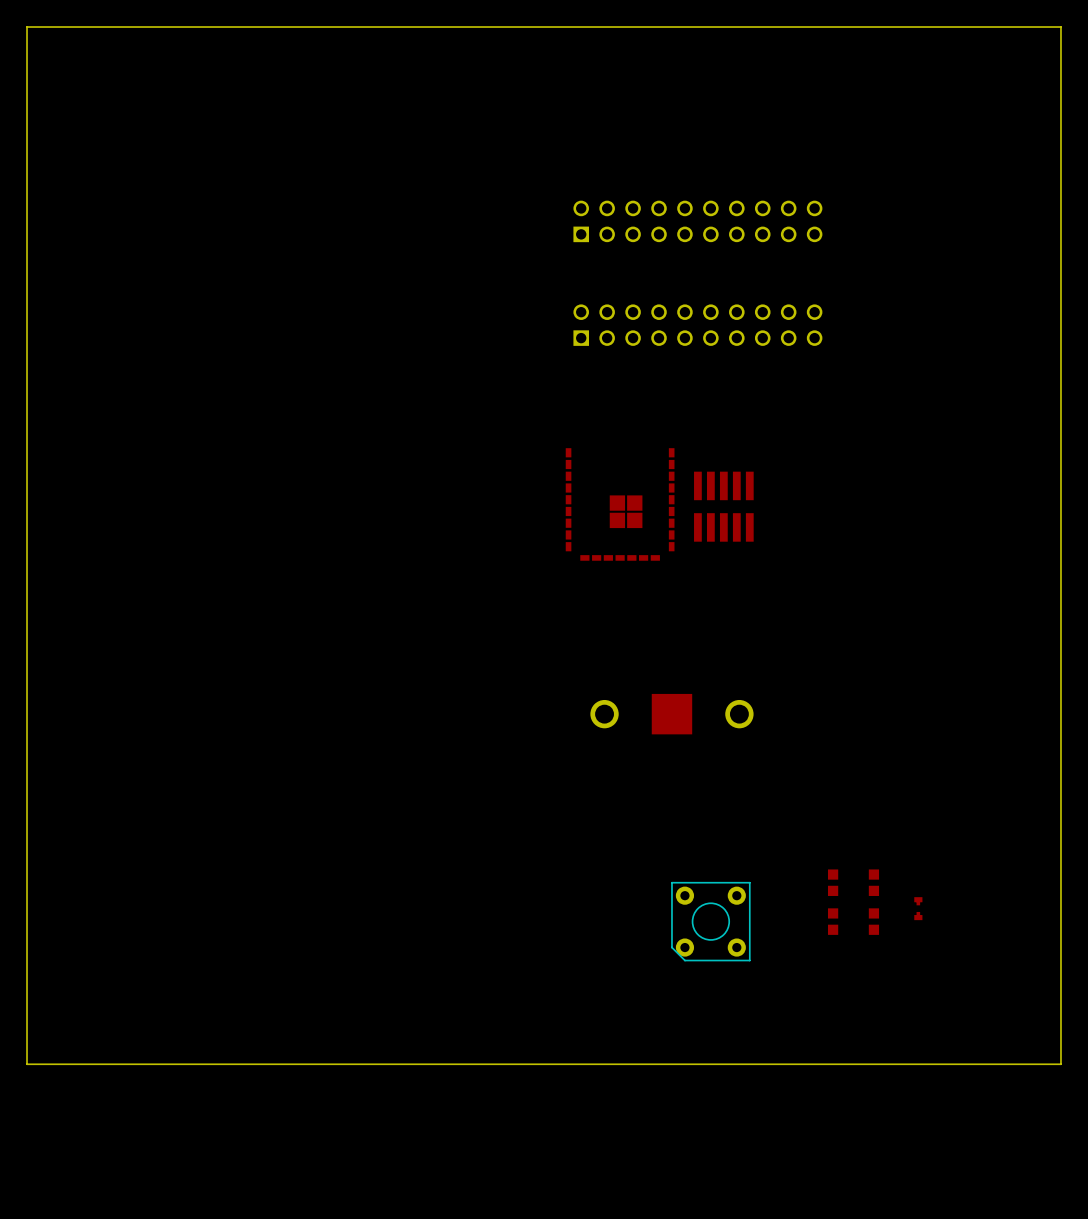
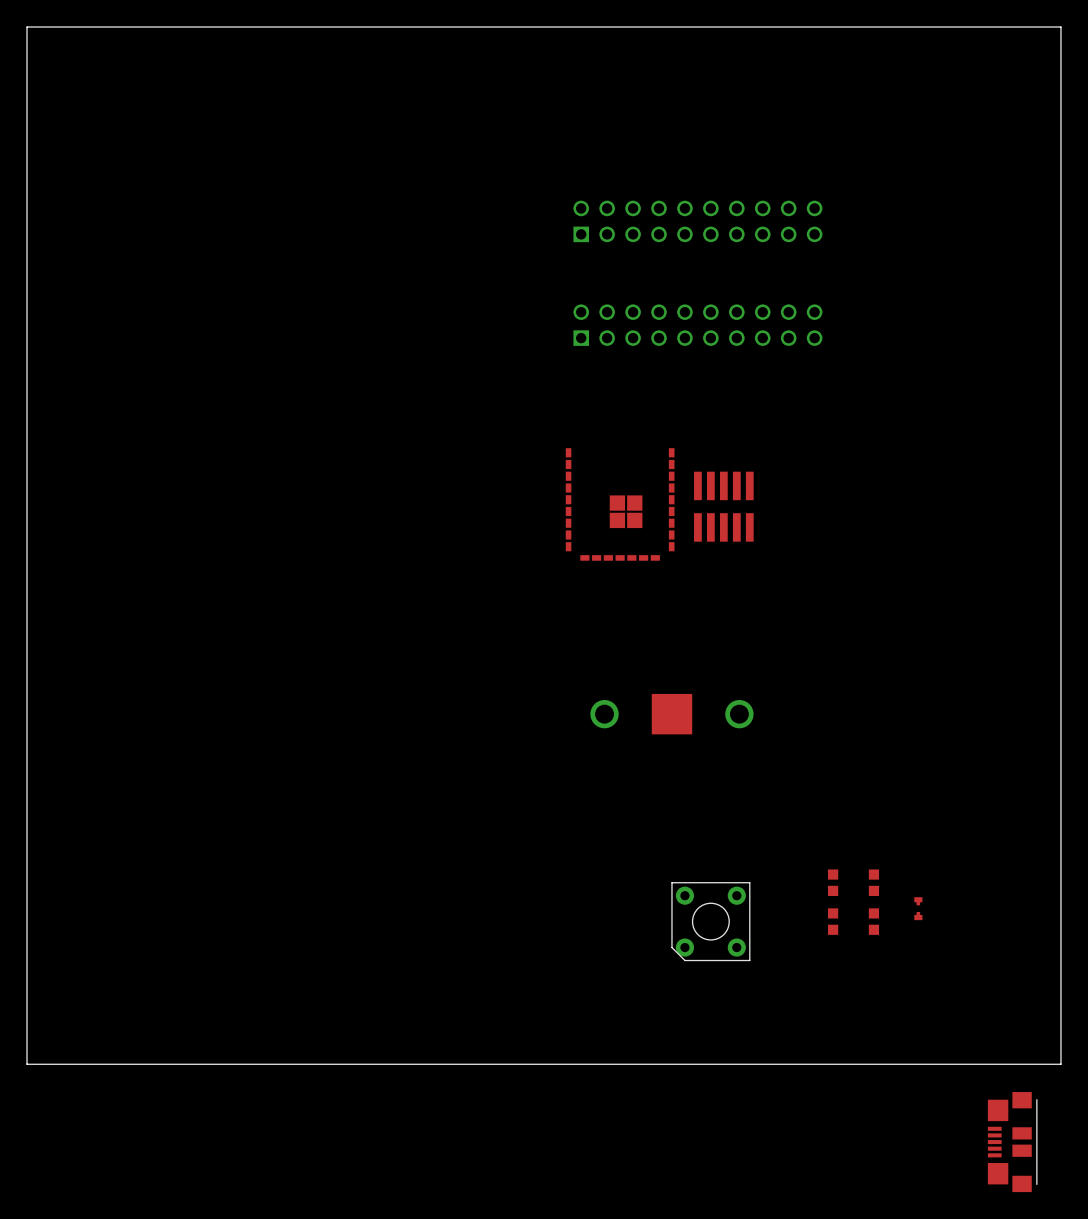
part: none -> (1012, 1142)

